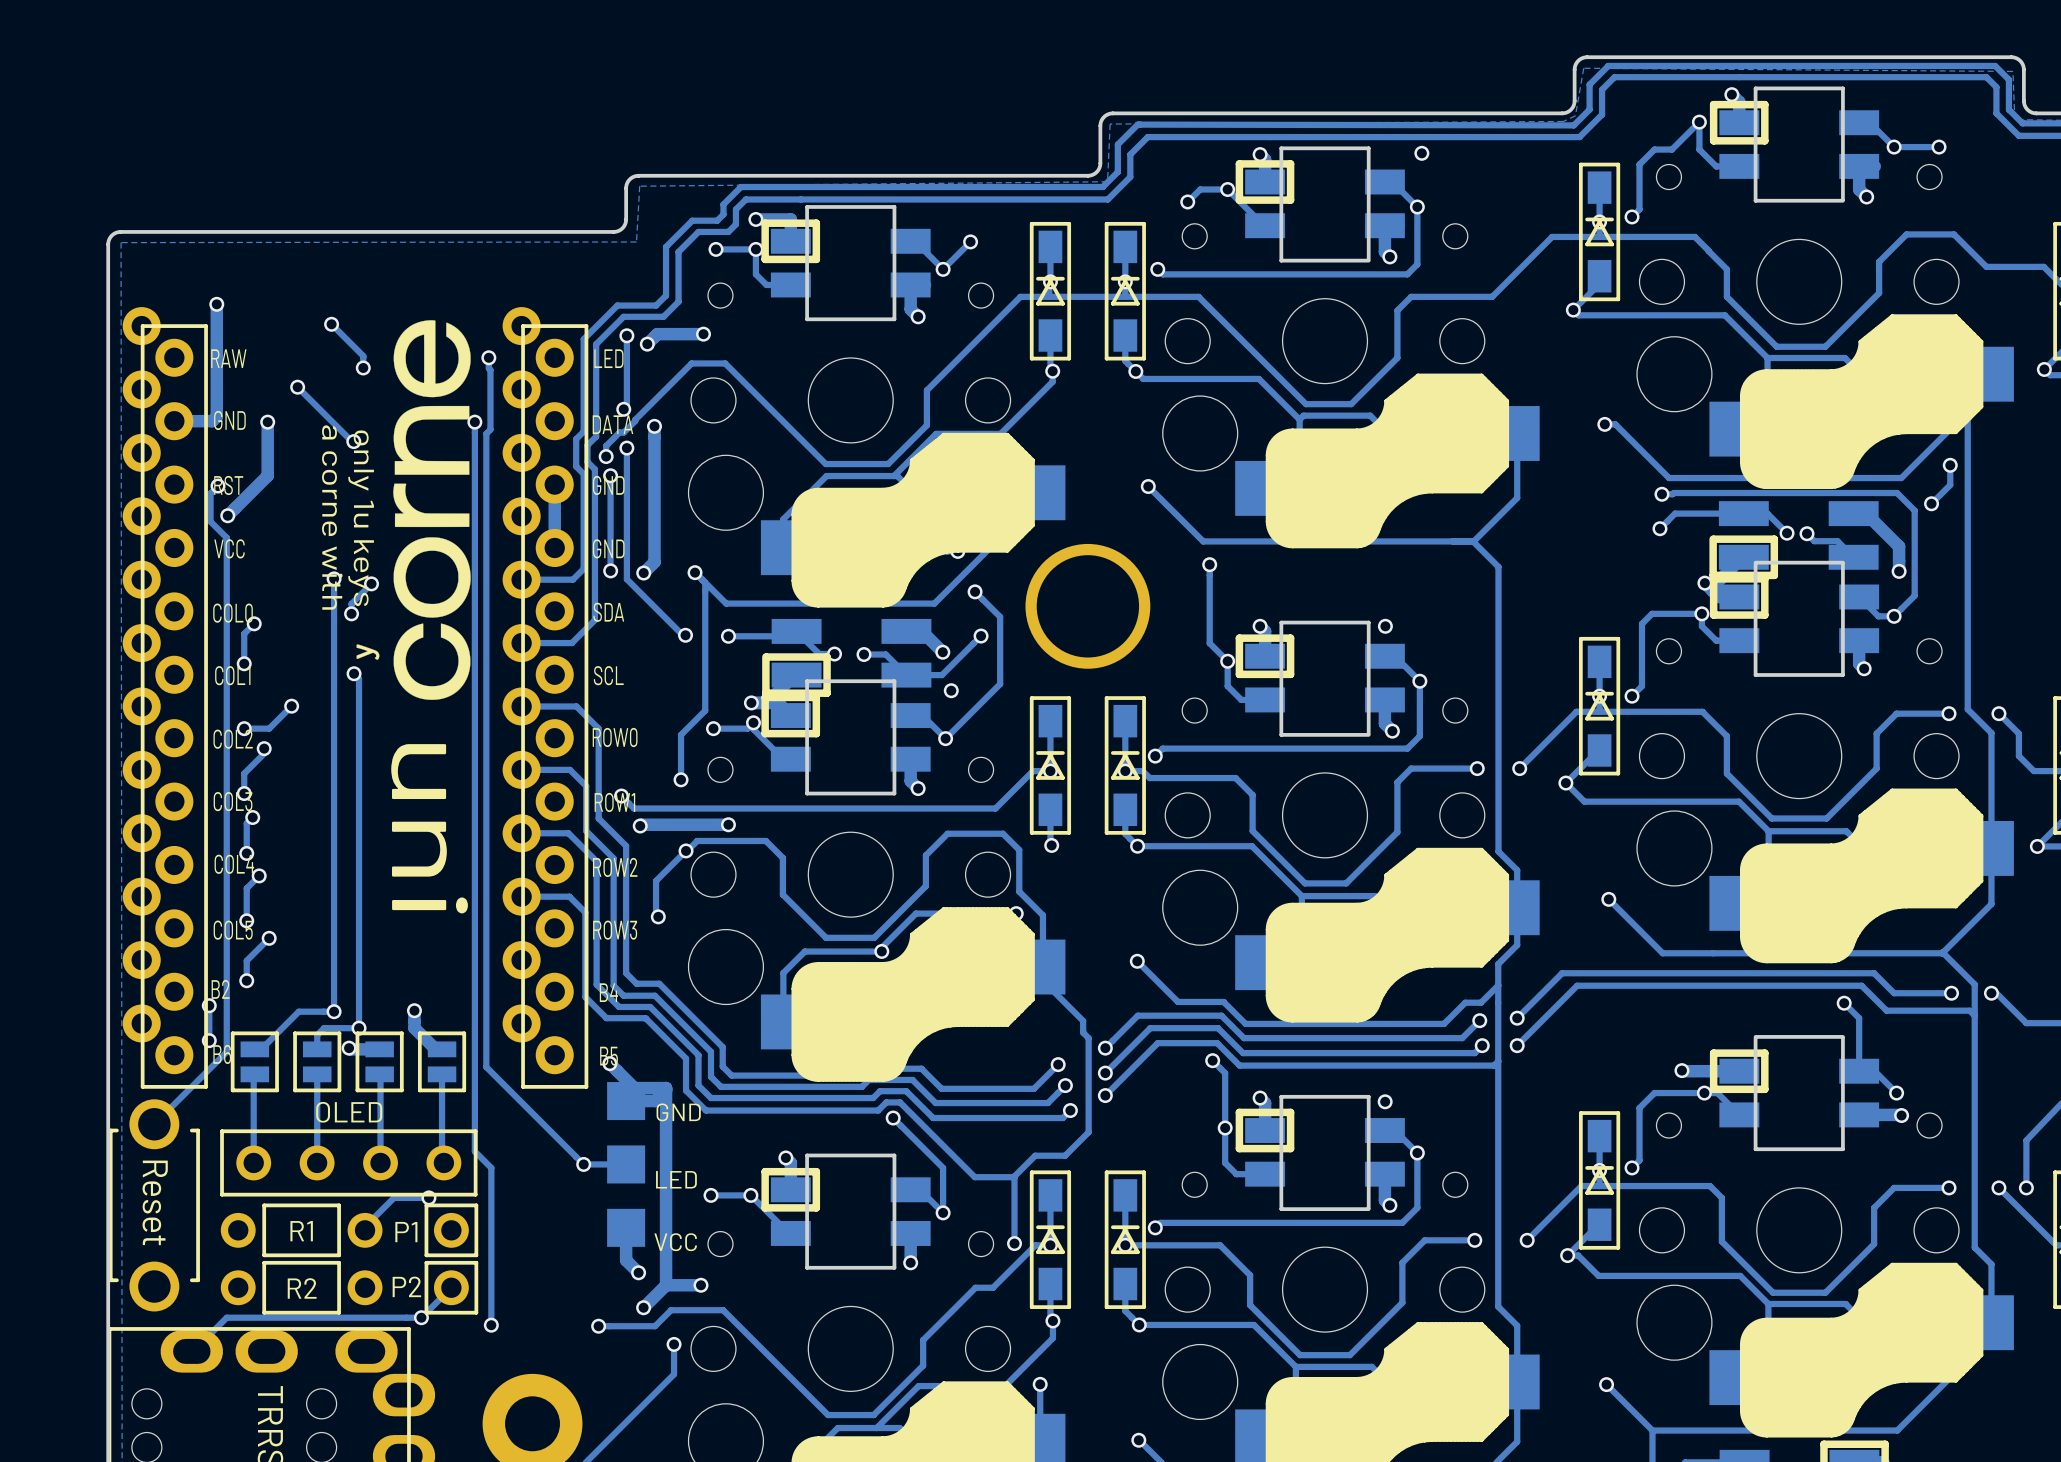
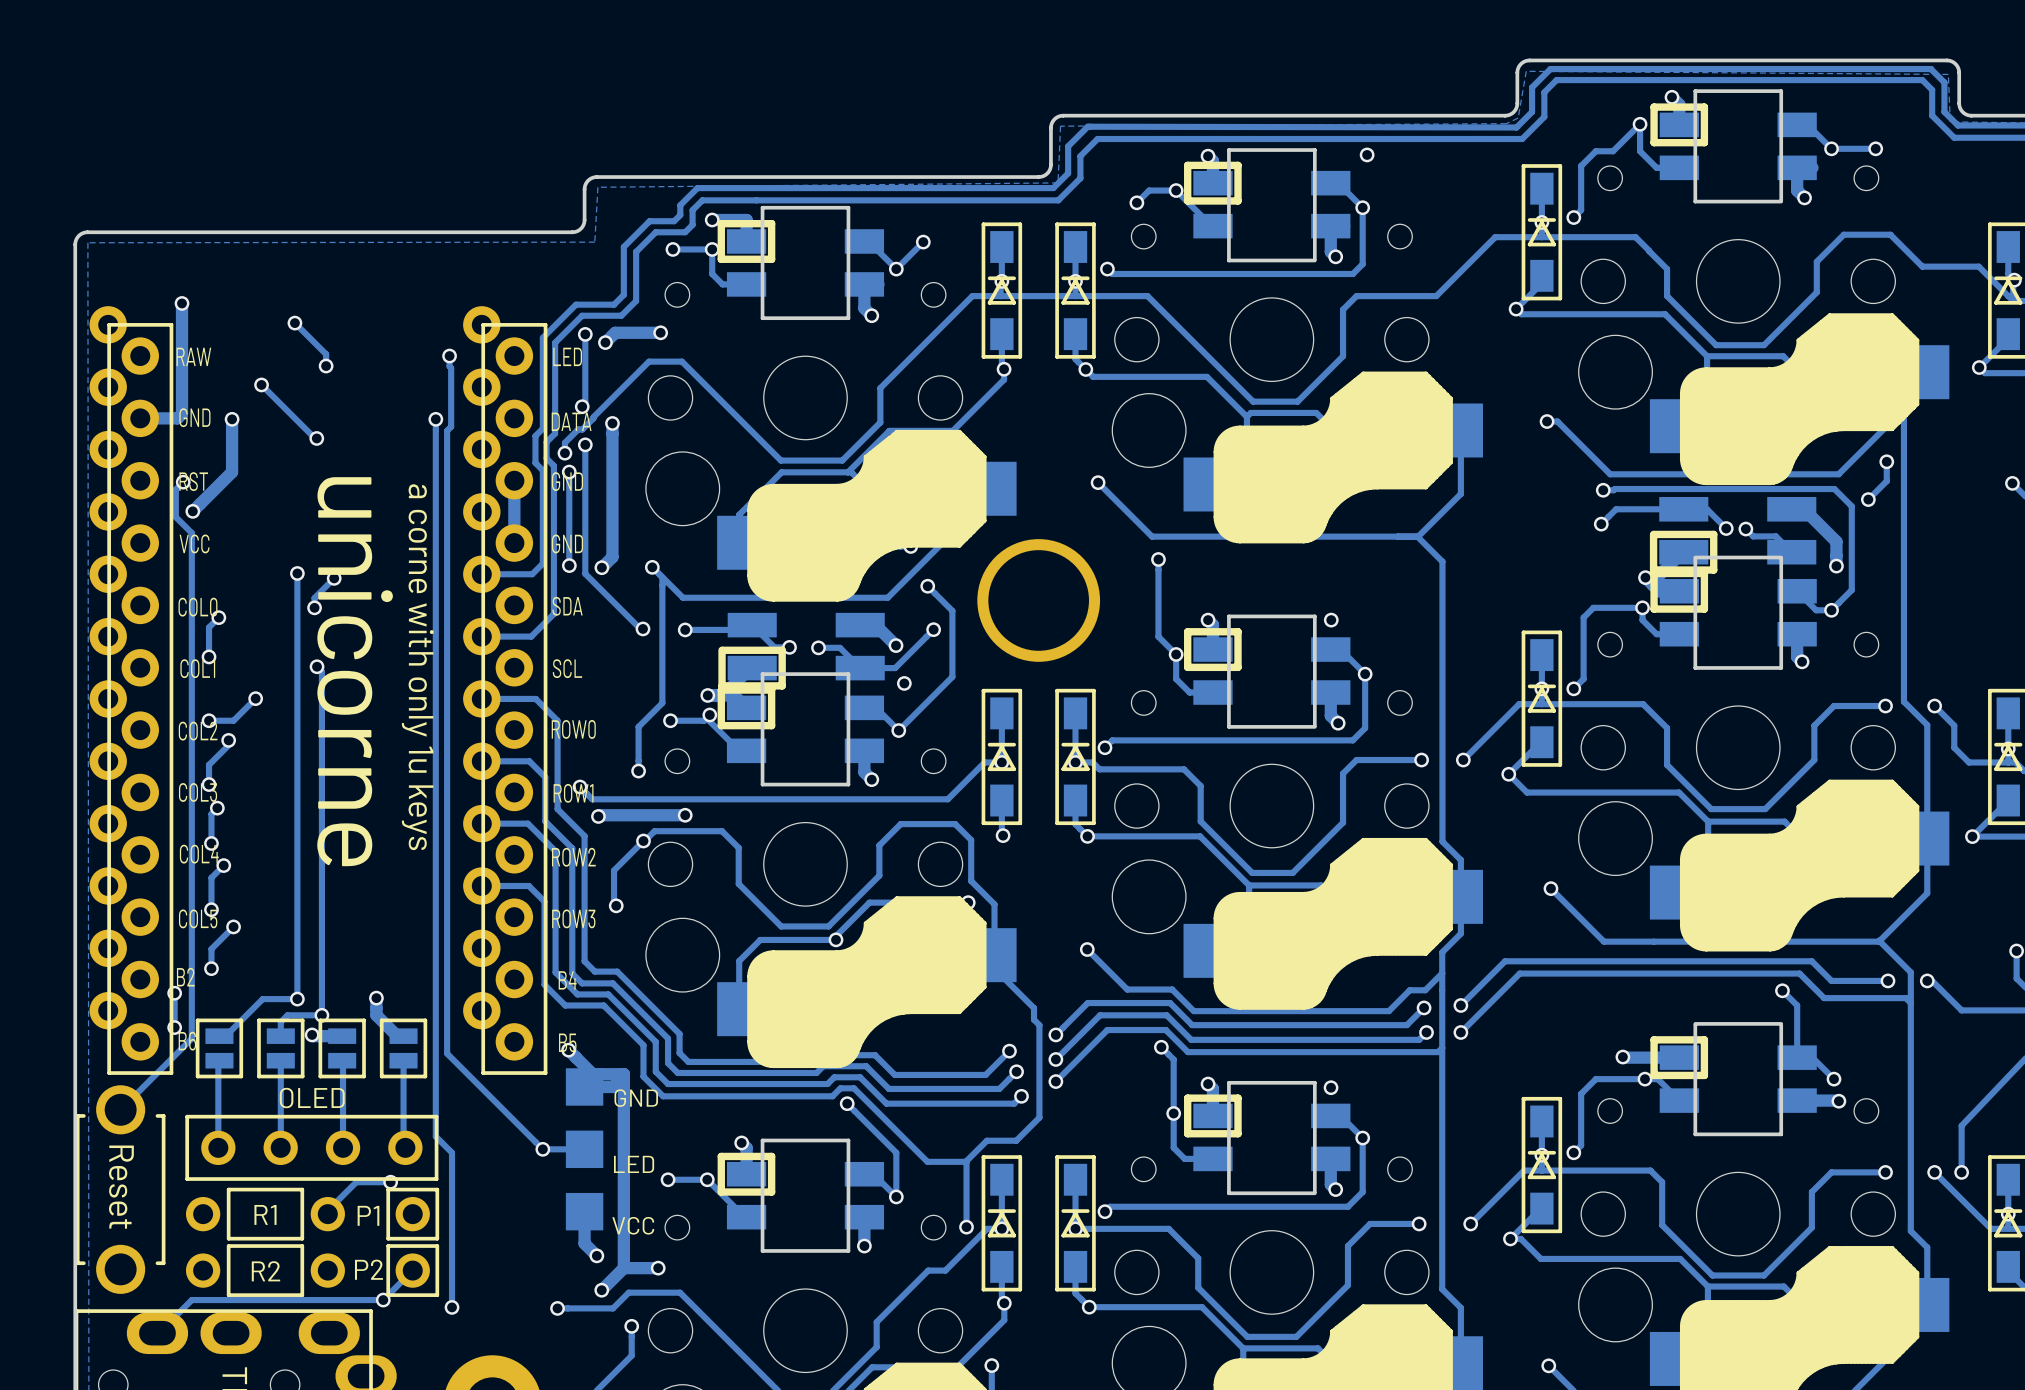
drawing: [356, 320, 471, 700] -> none
drawing: none -> [317, 477, 434, 867]

